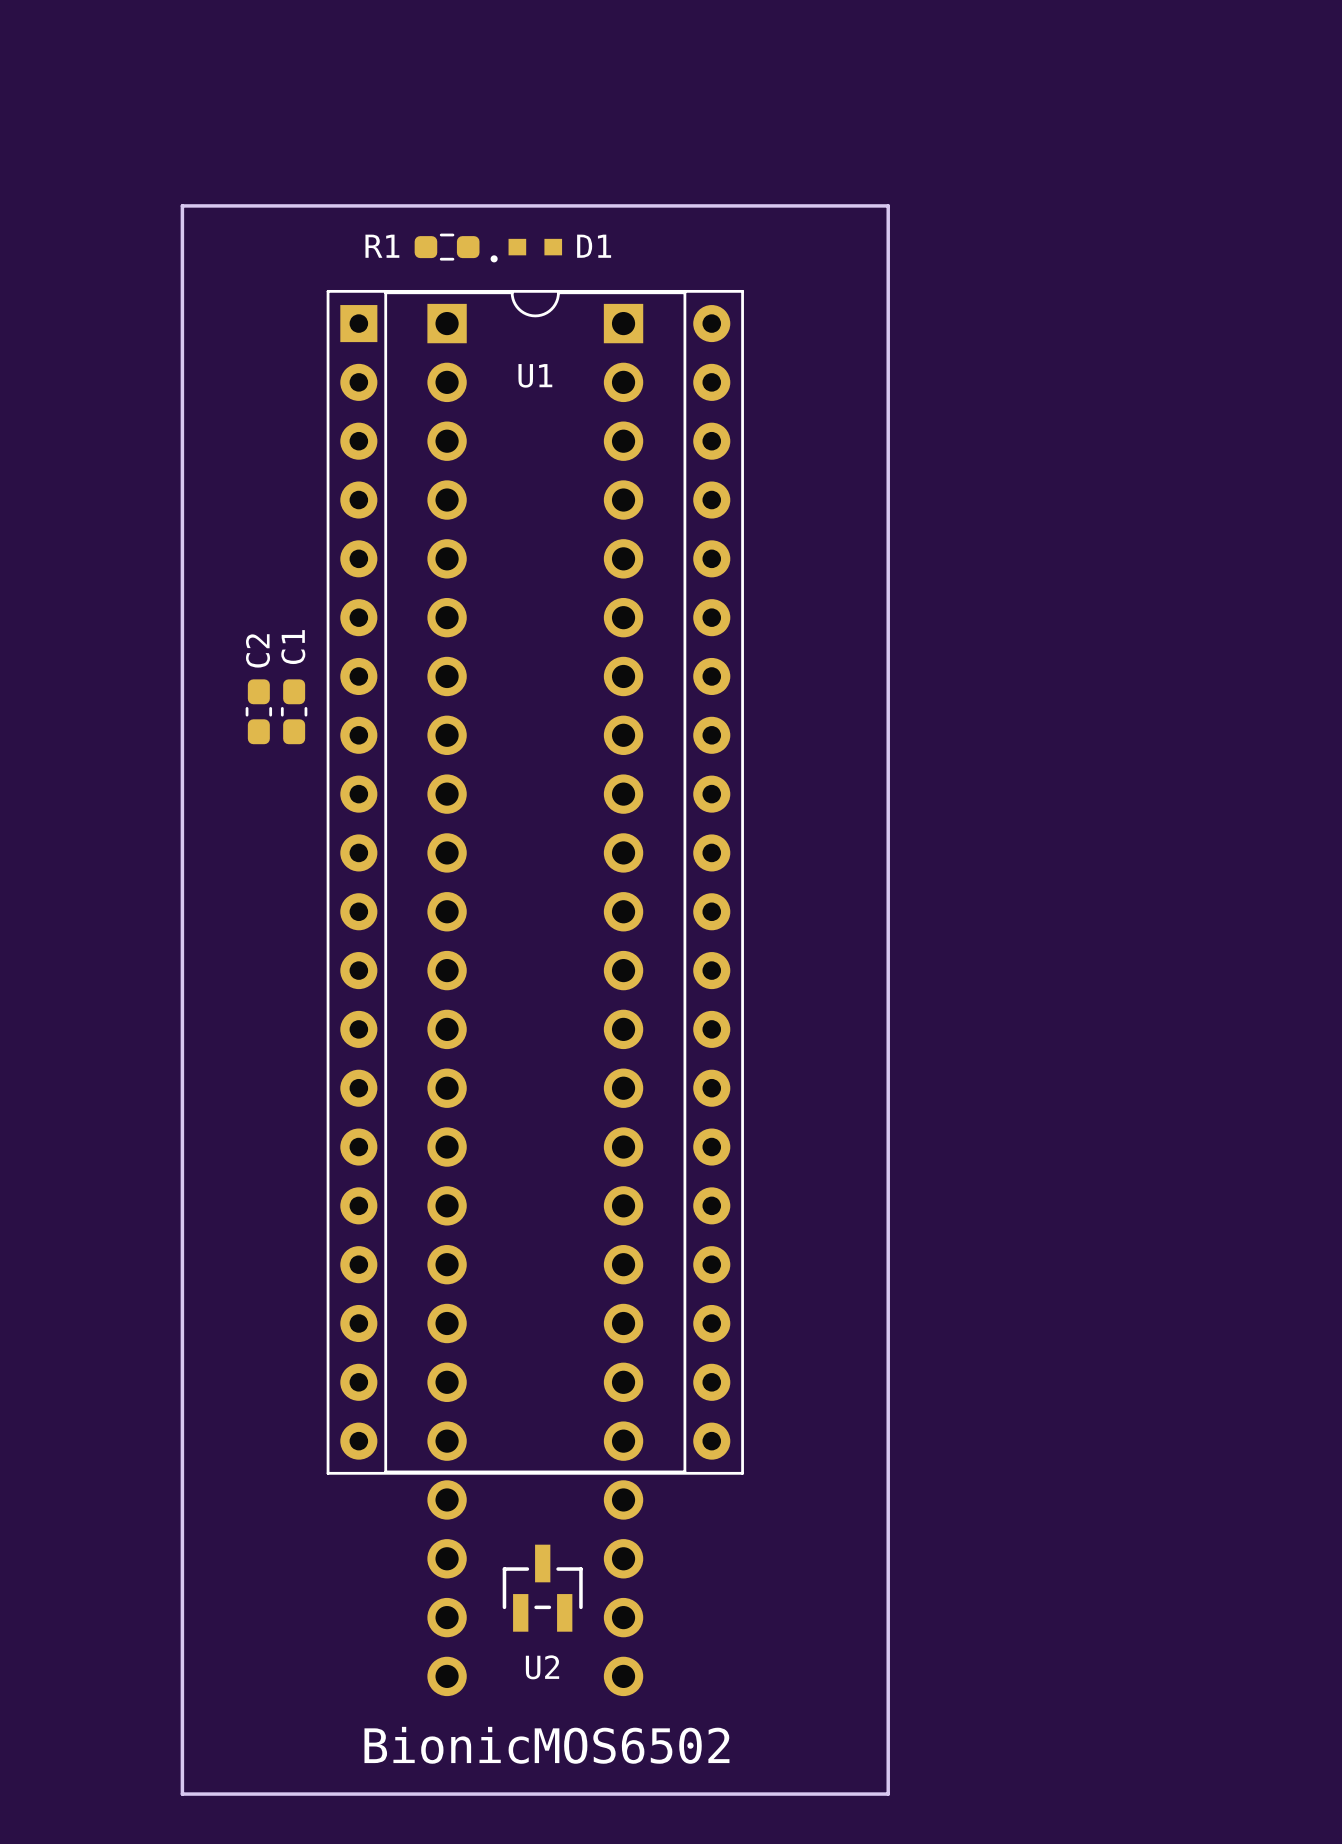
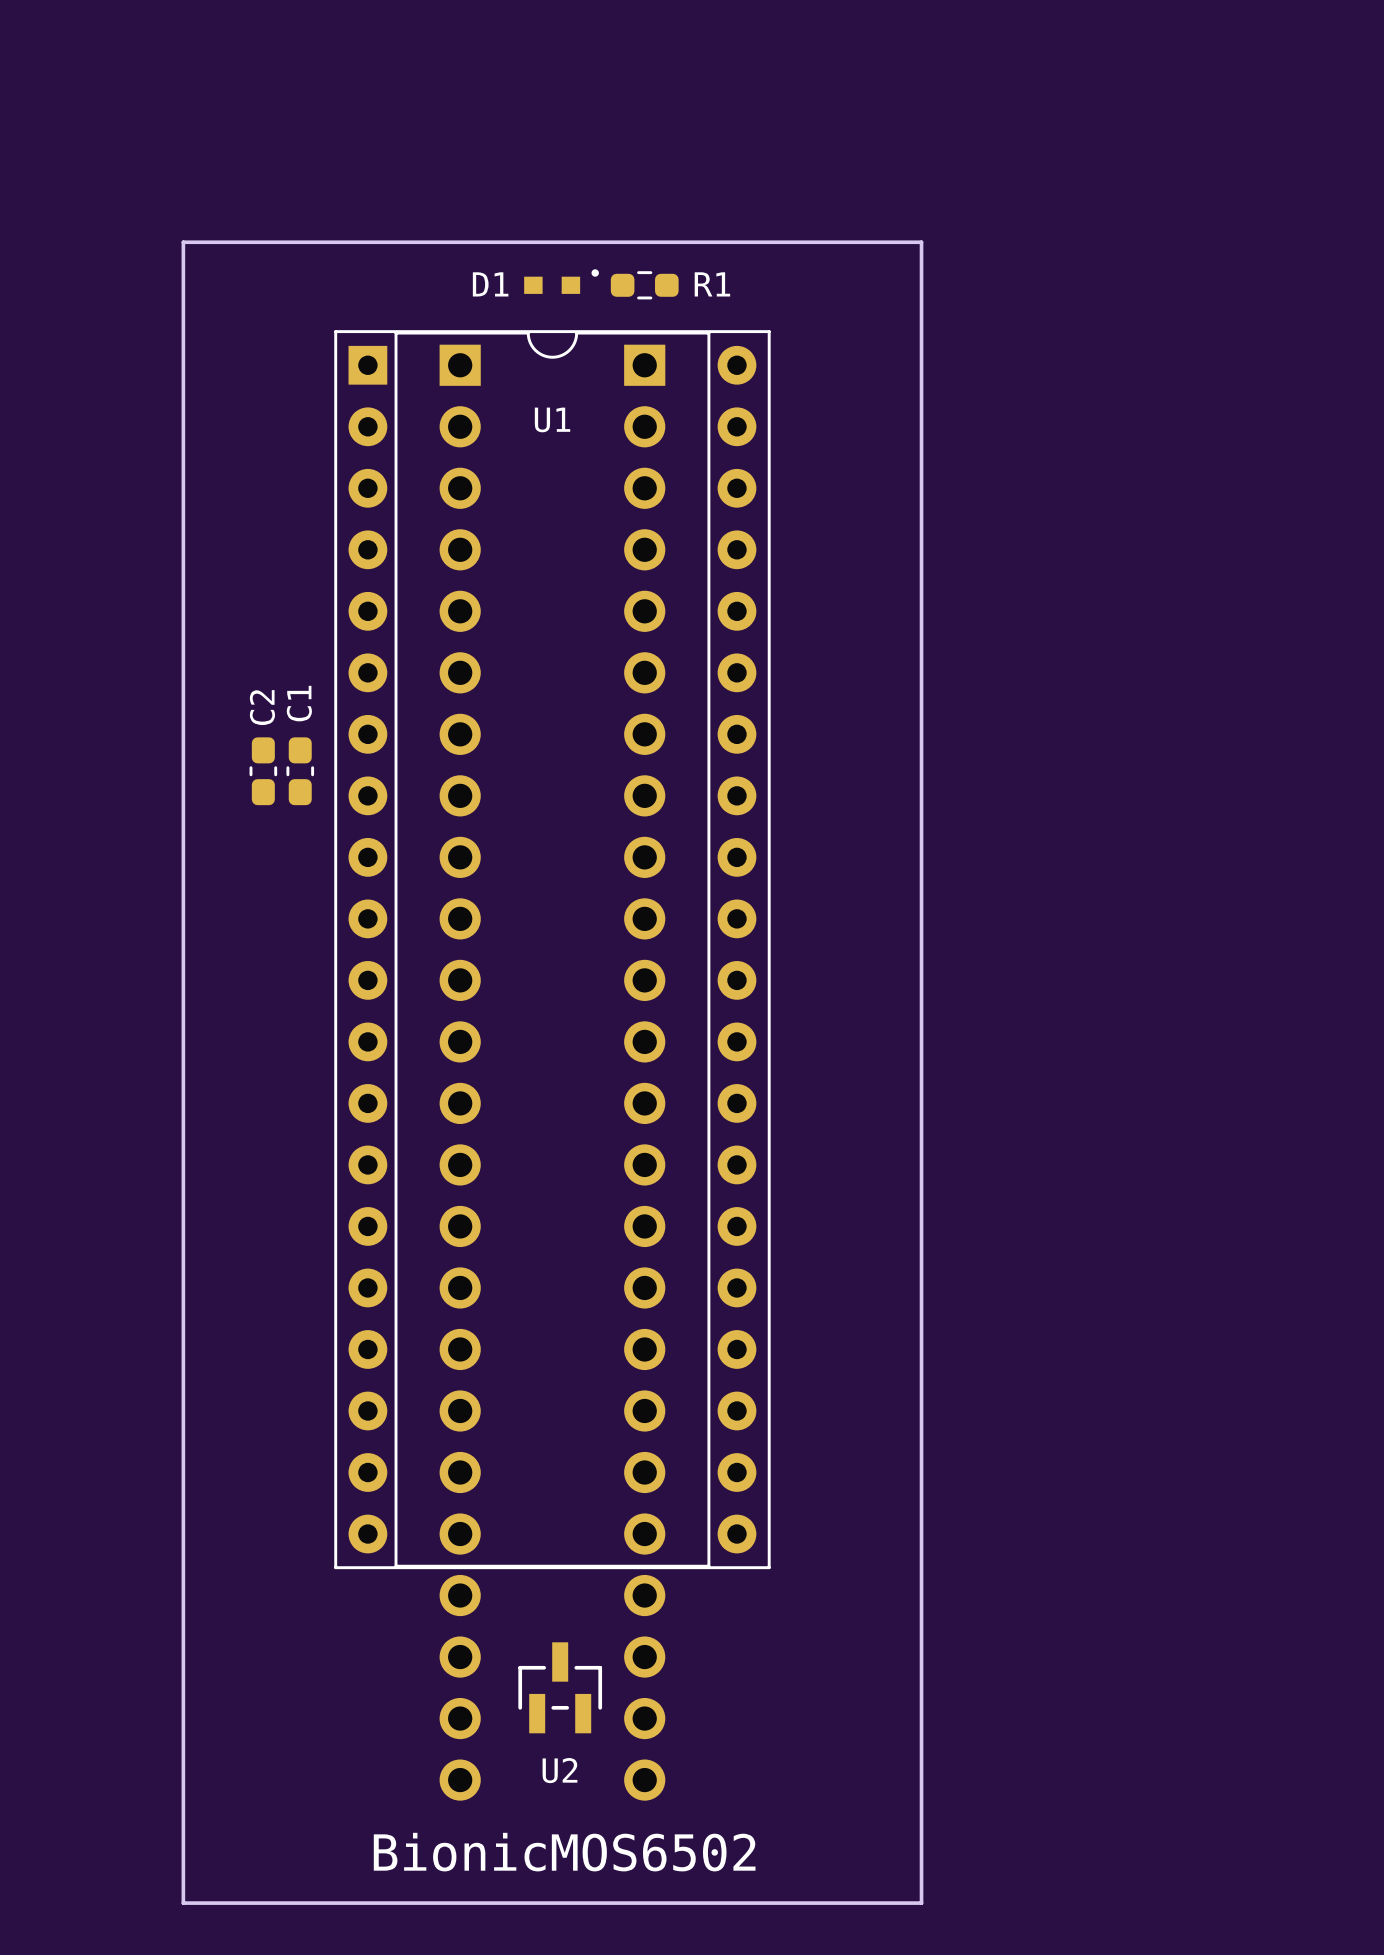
R1 name position: R1 (382, 246) -> R1 (712, 284)
R1 position: (447, 247) -> (644, 285)
D1 rotation: 0° (526, 250) -> 180° (561, 281)

